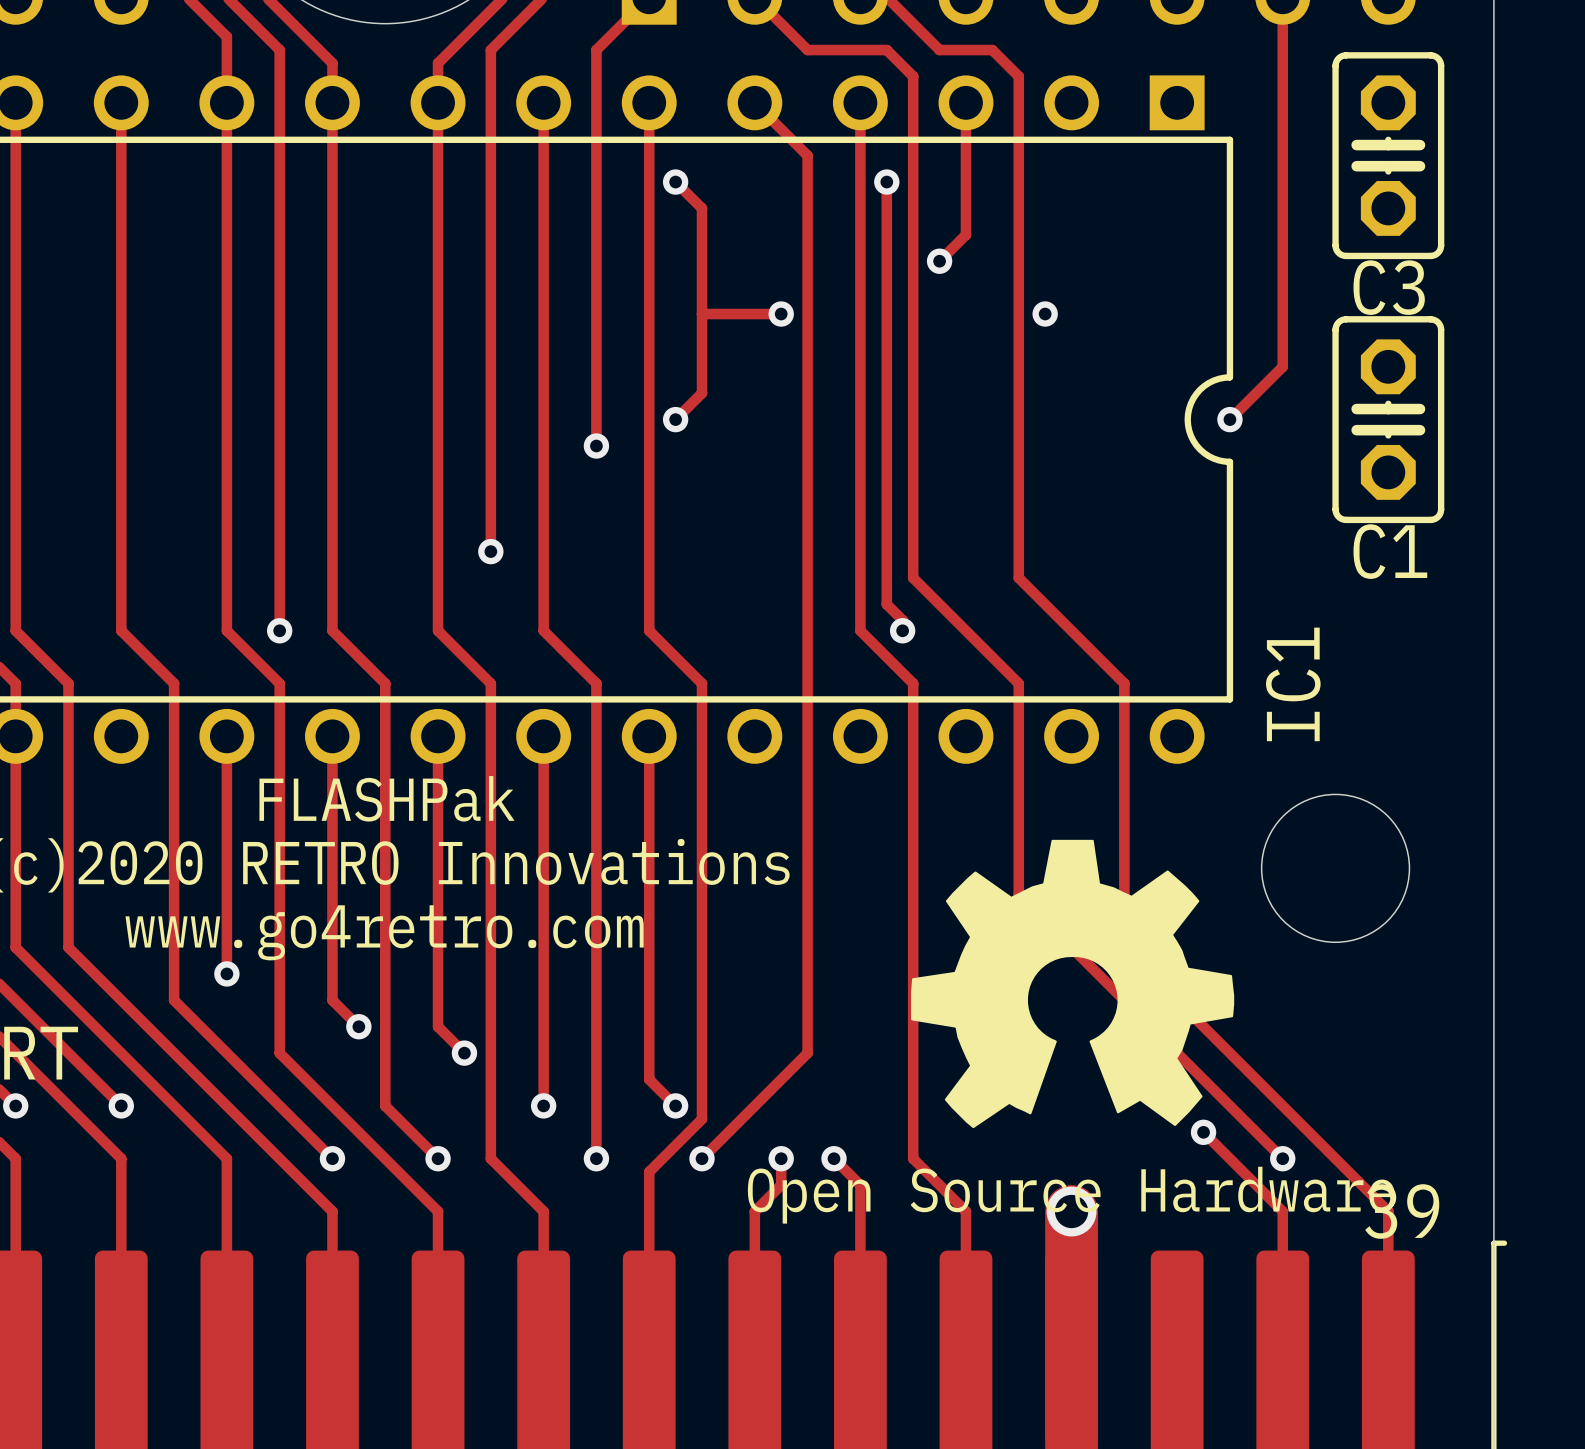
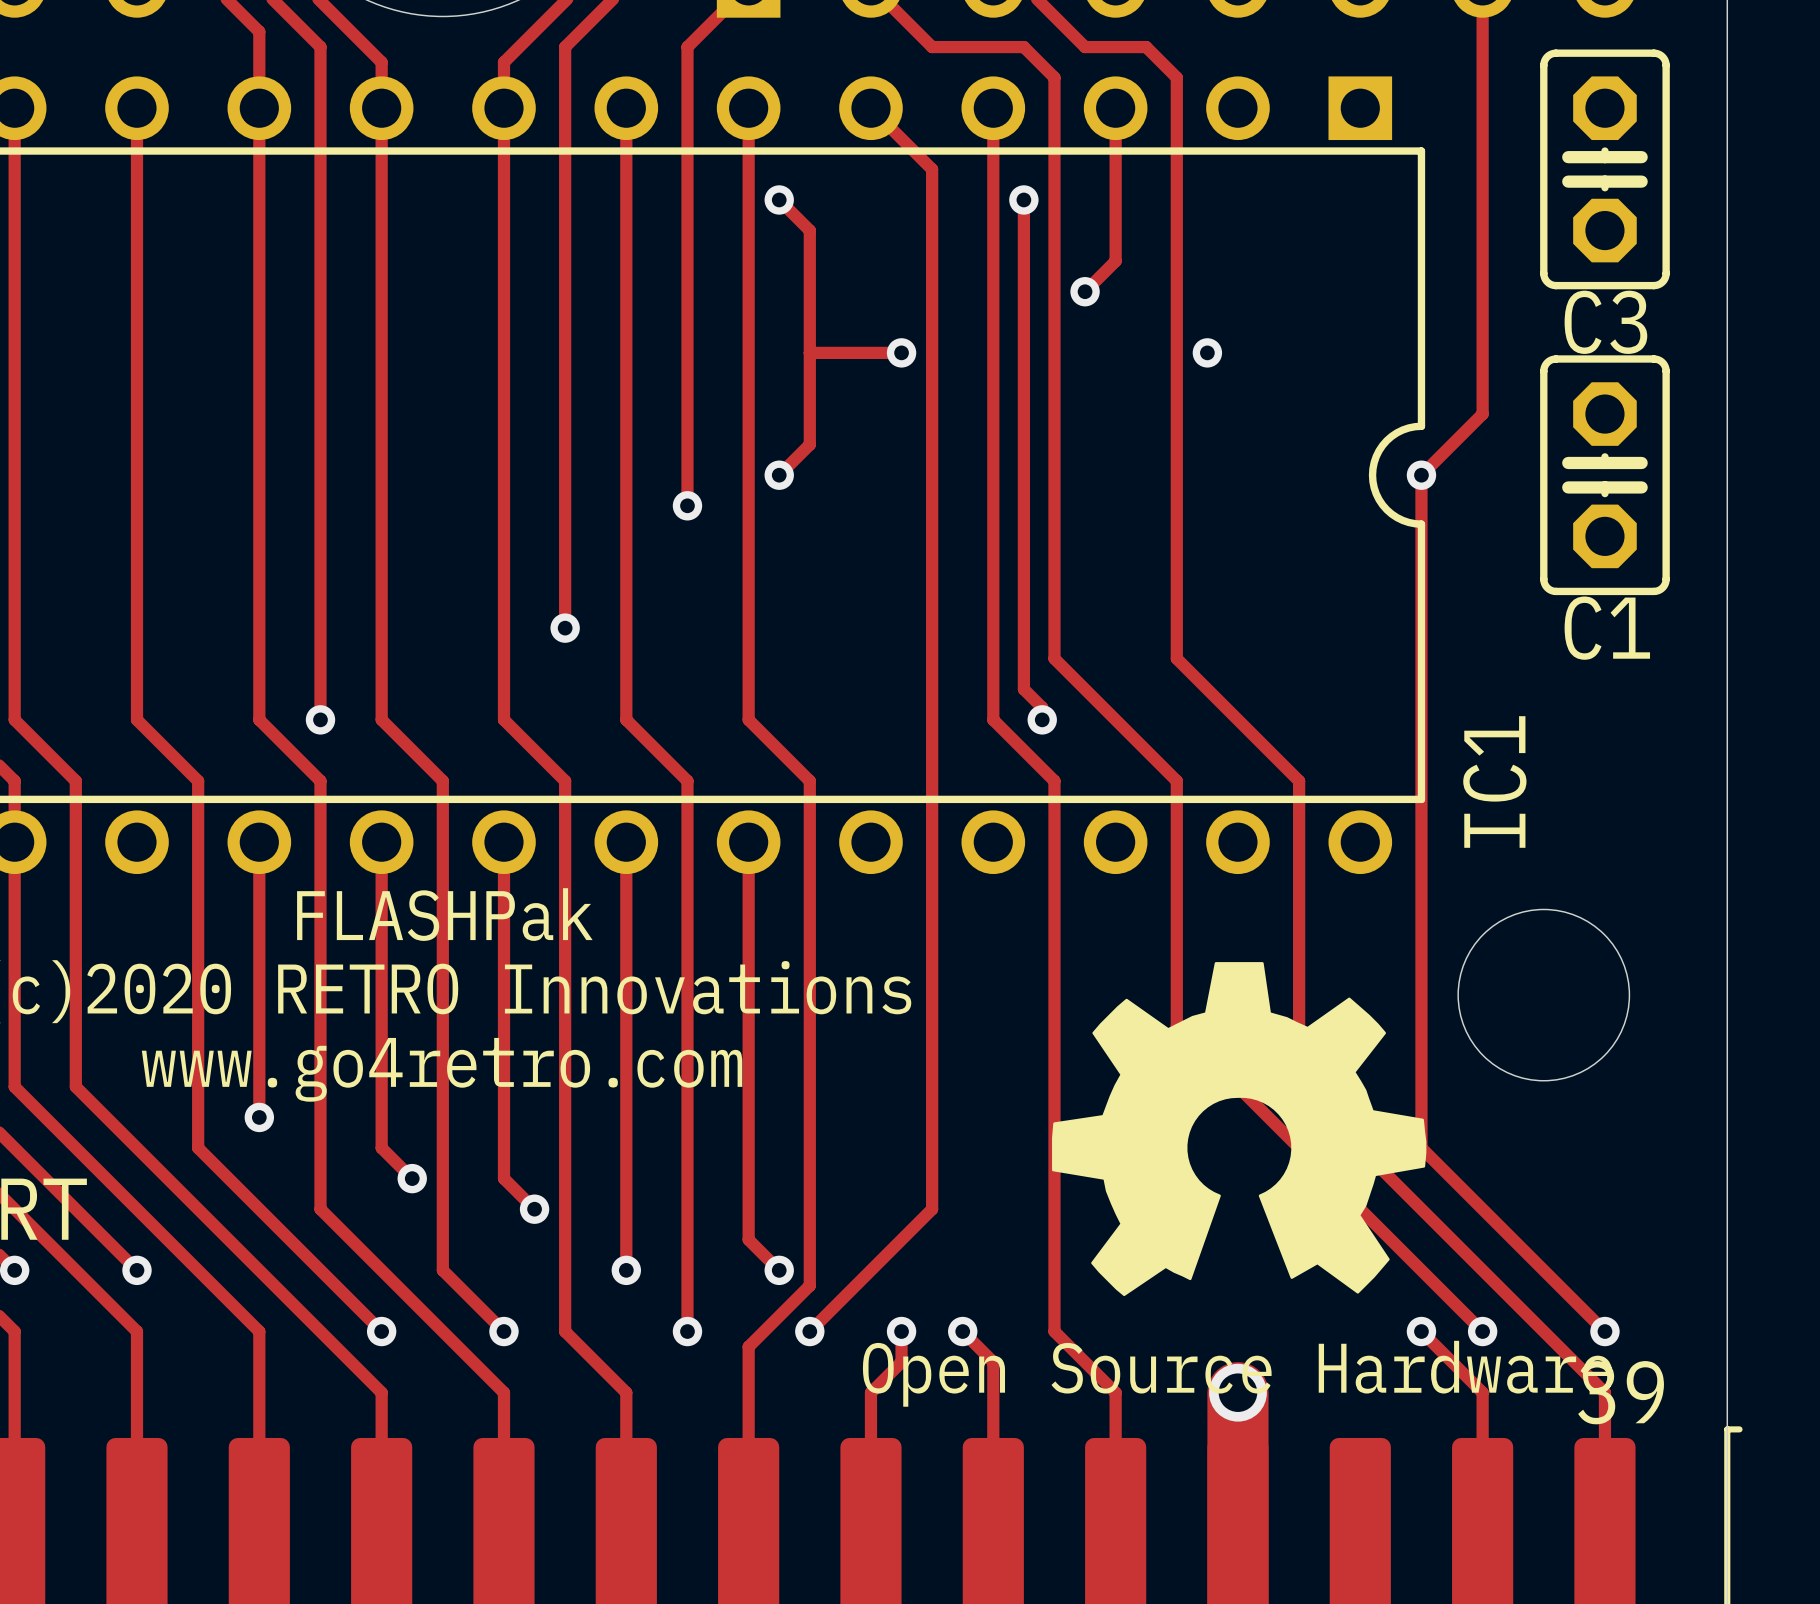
track: none -> (1421, 475) (1421, 1148) (1604, 1331)
track: (1203, 1132) (1229, 1158) -> none
via position: (1203, 1132) -> (1421, 1331)
via: none -> (1604, 1331)

